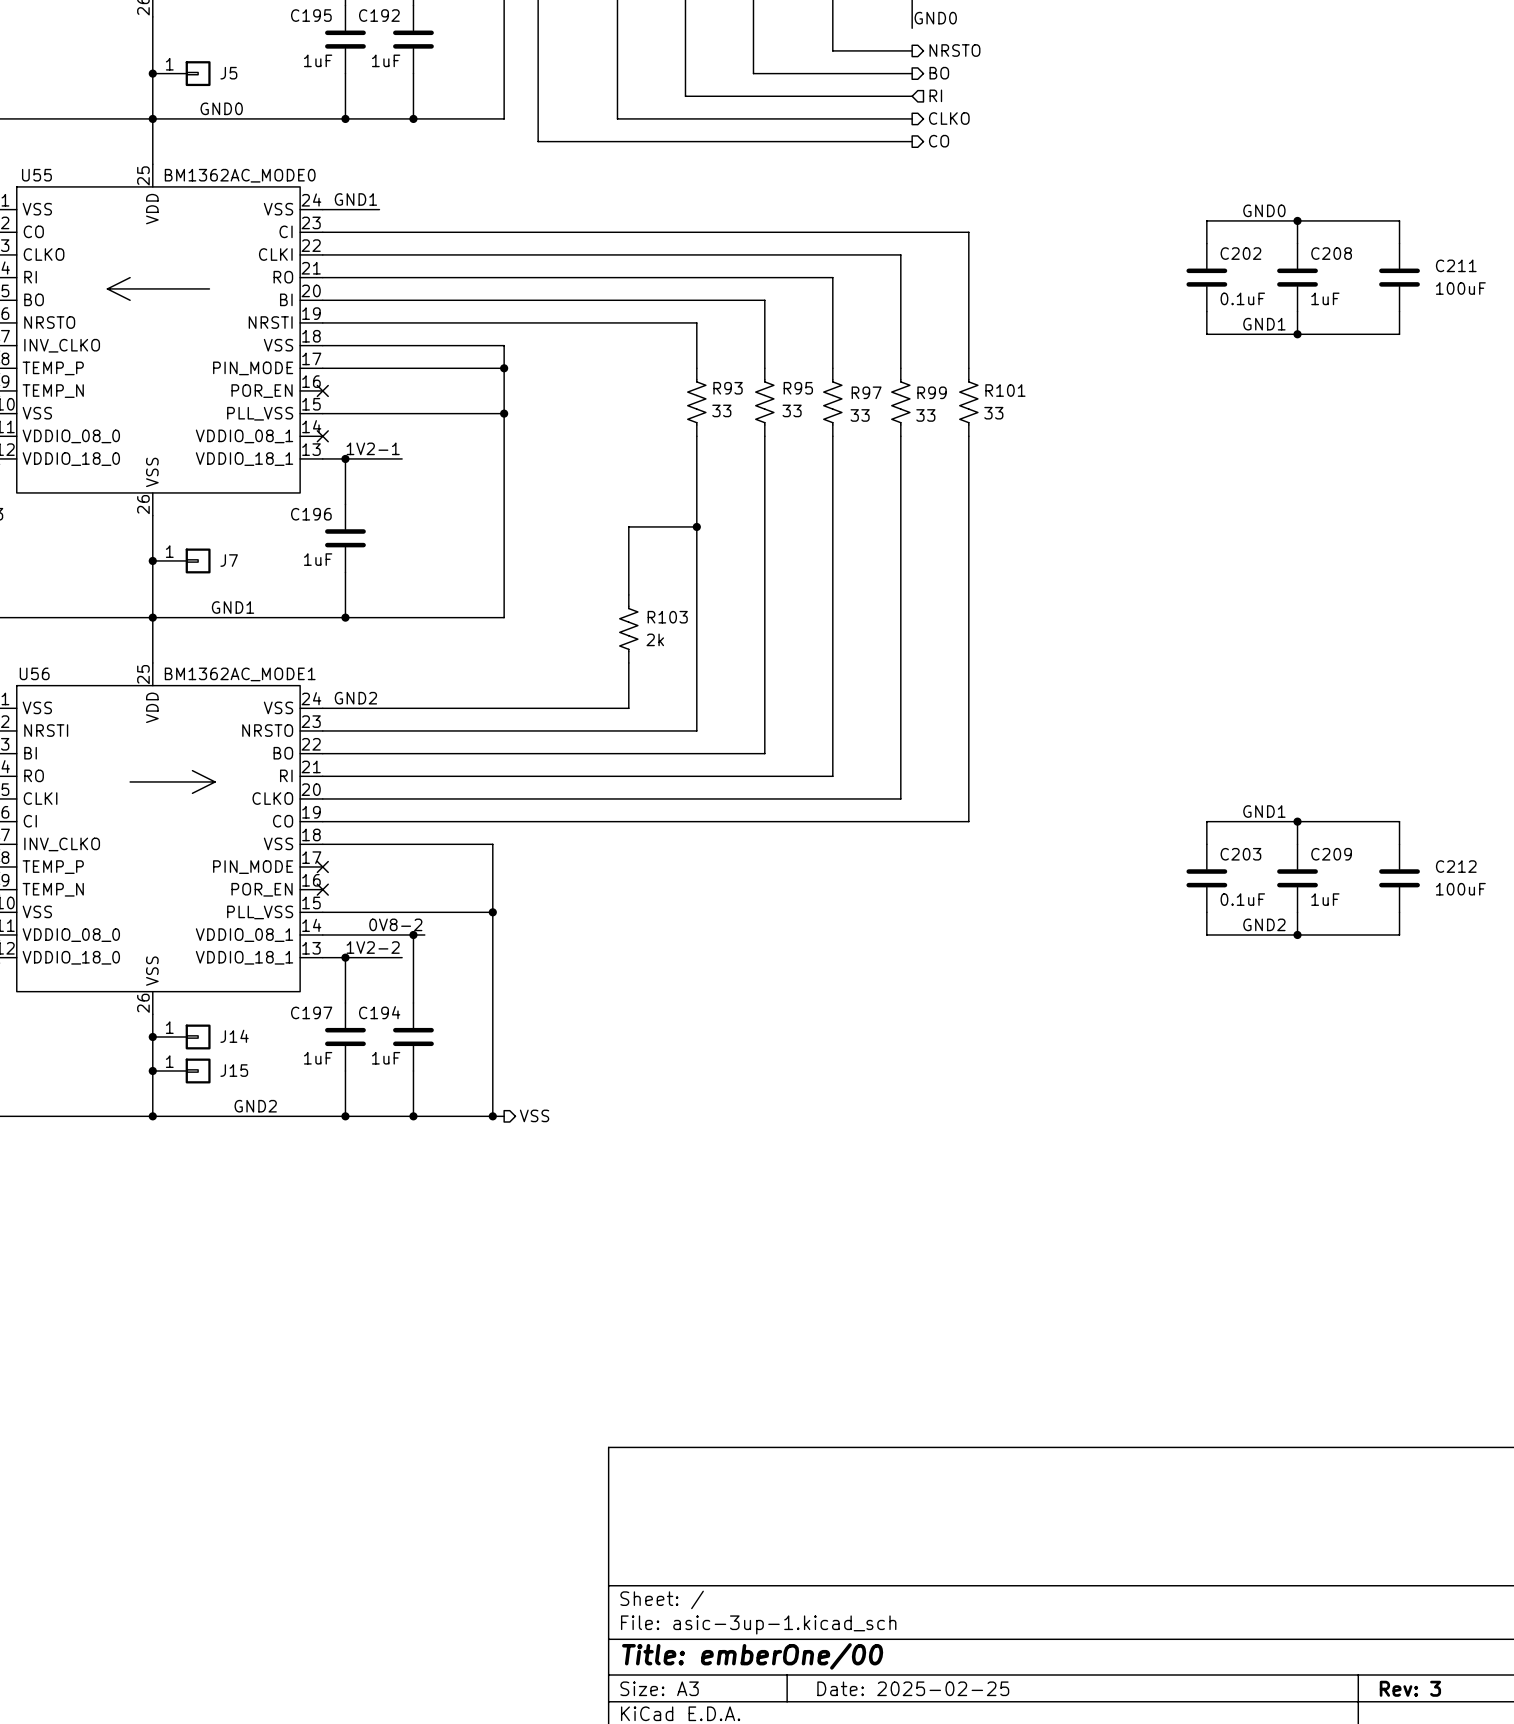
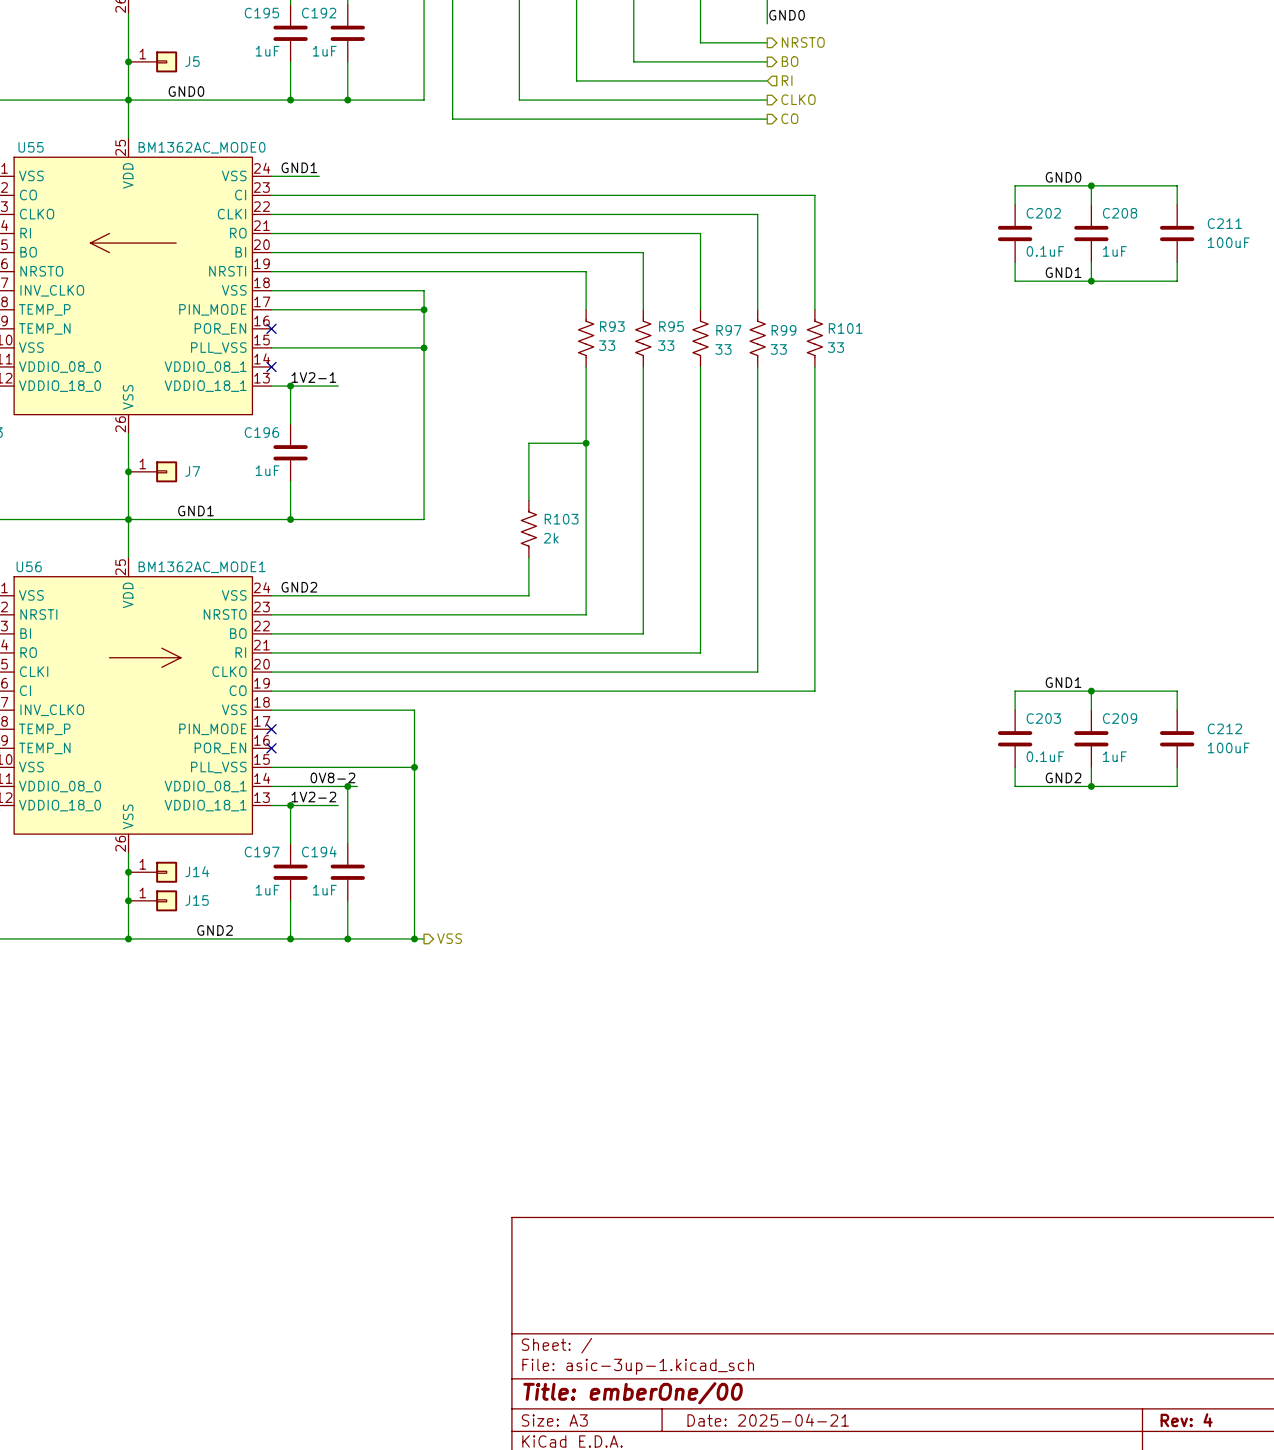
title block: Date: 2025-02-25 (913, 1688) -> Date: 2025-04-21 (768, 1420)
title block: Rev: 3 (1410, 1688) -> Rev: 4 (1186, 1420)

